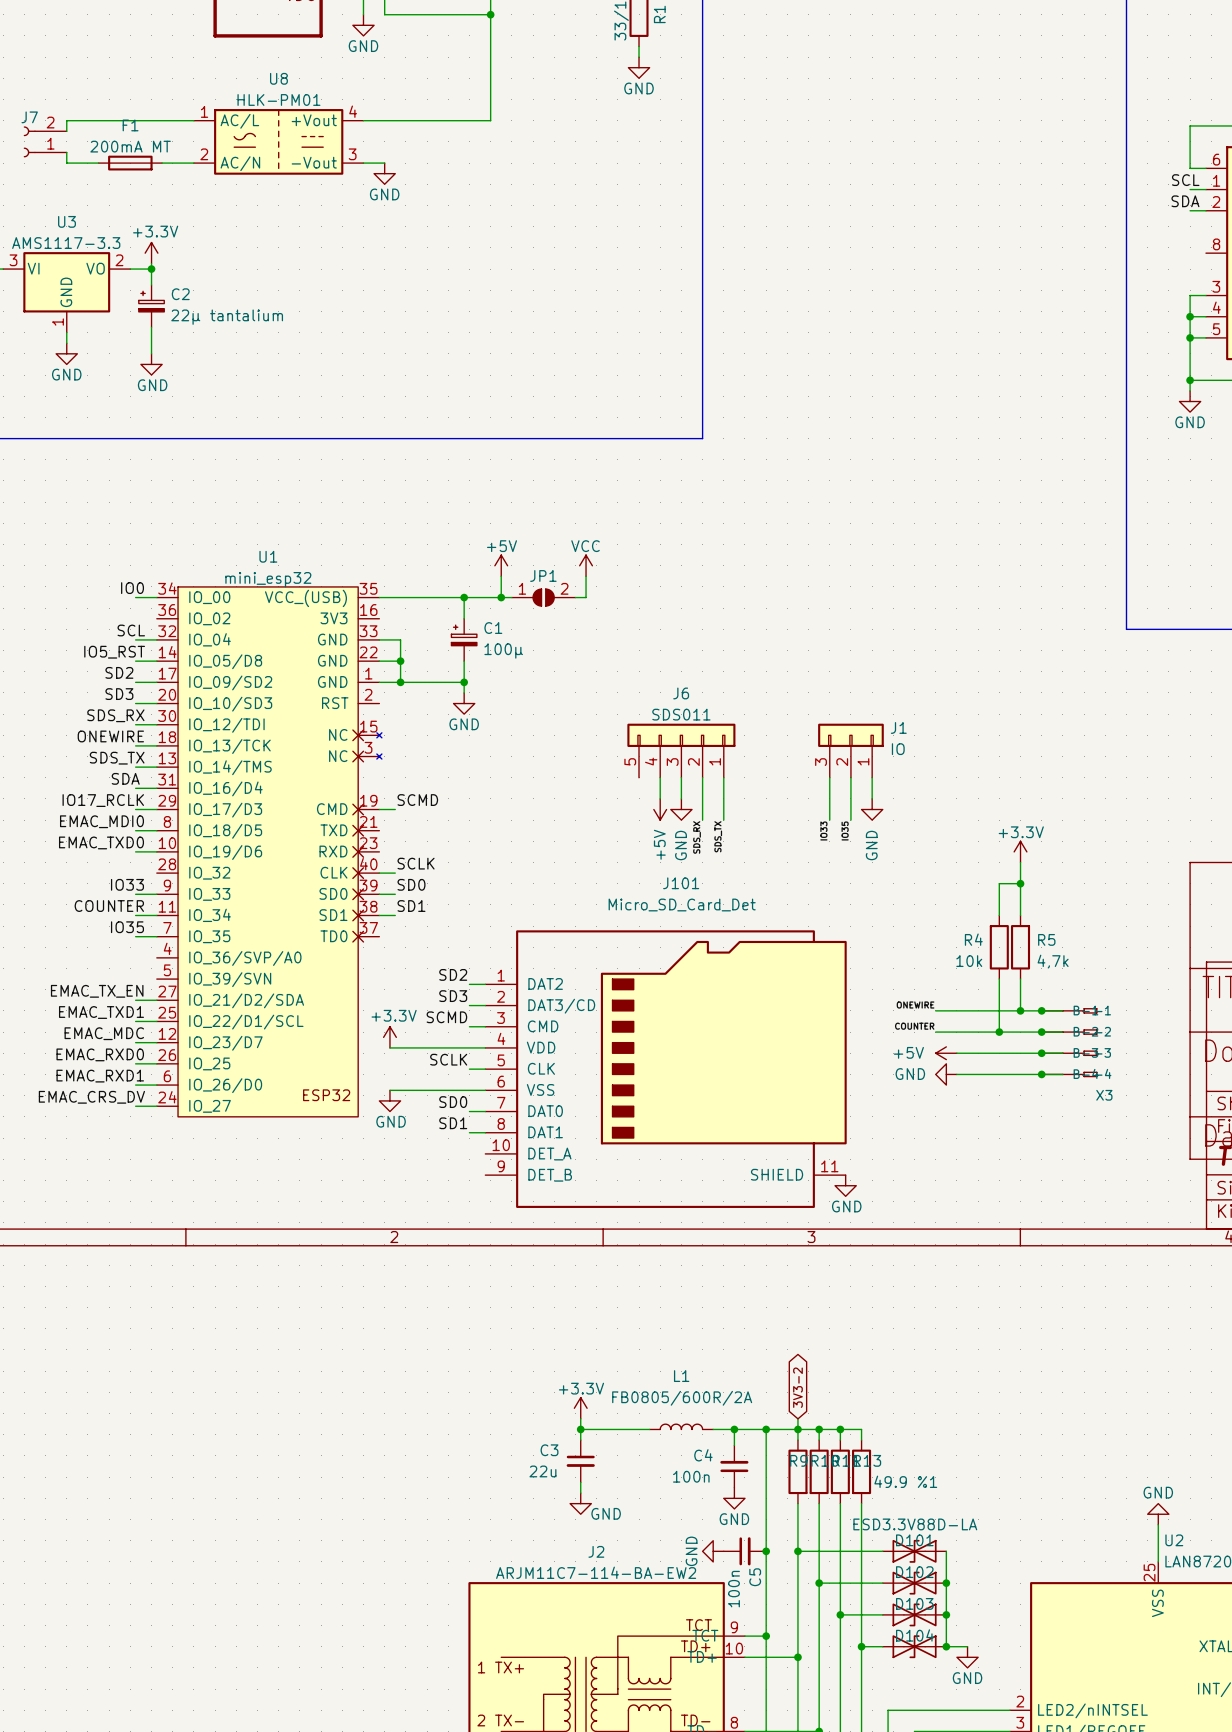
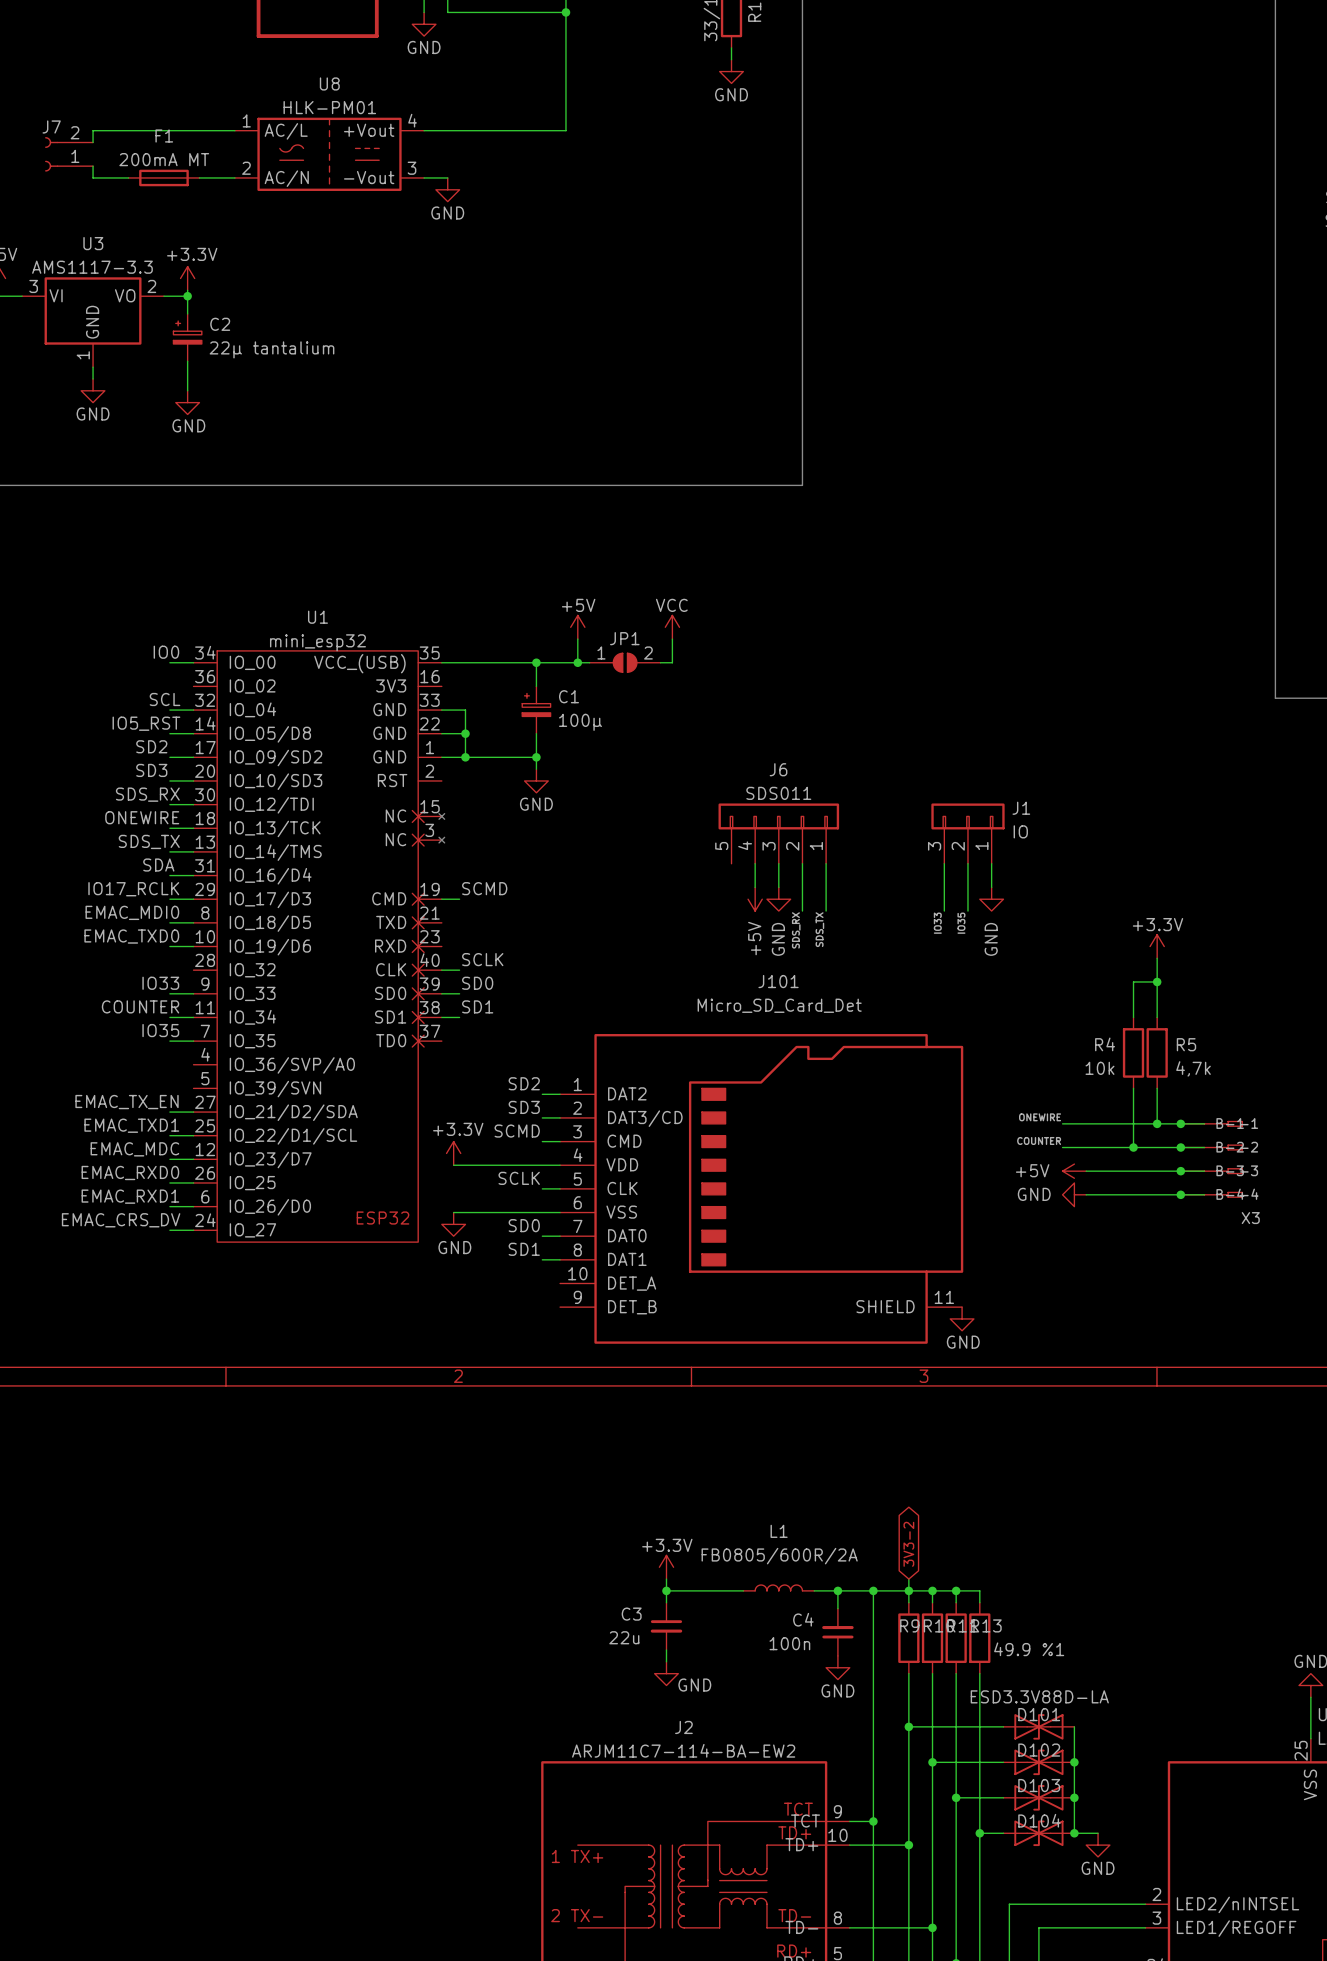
power symbol: GND (713, 1551) -> none
C5: 100n (744, 1551) -> none
junction: (766, 1551) -> none

